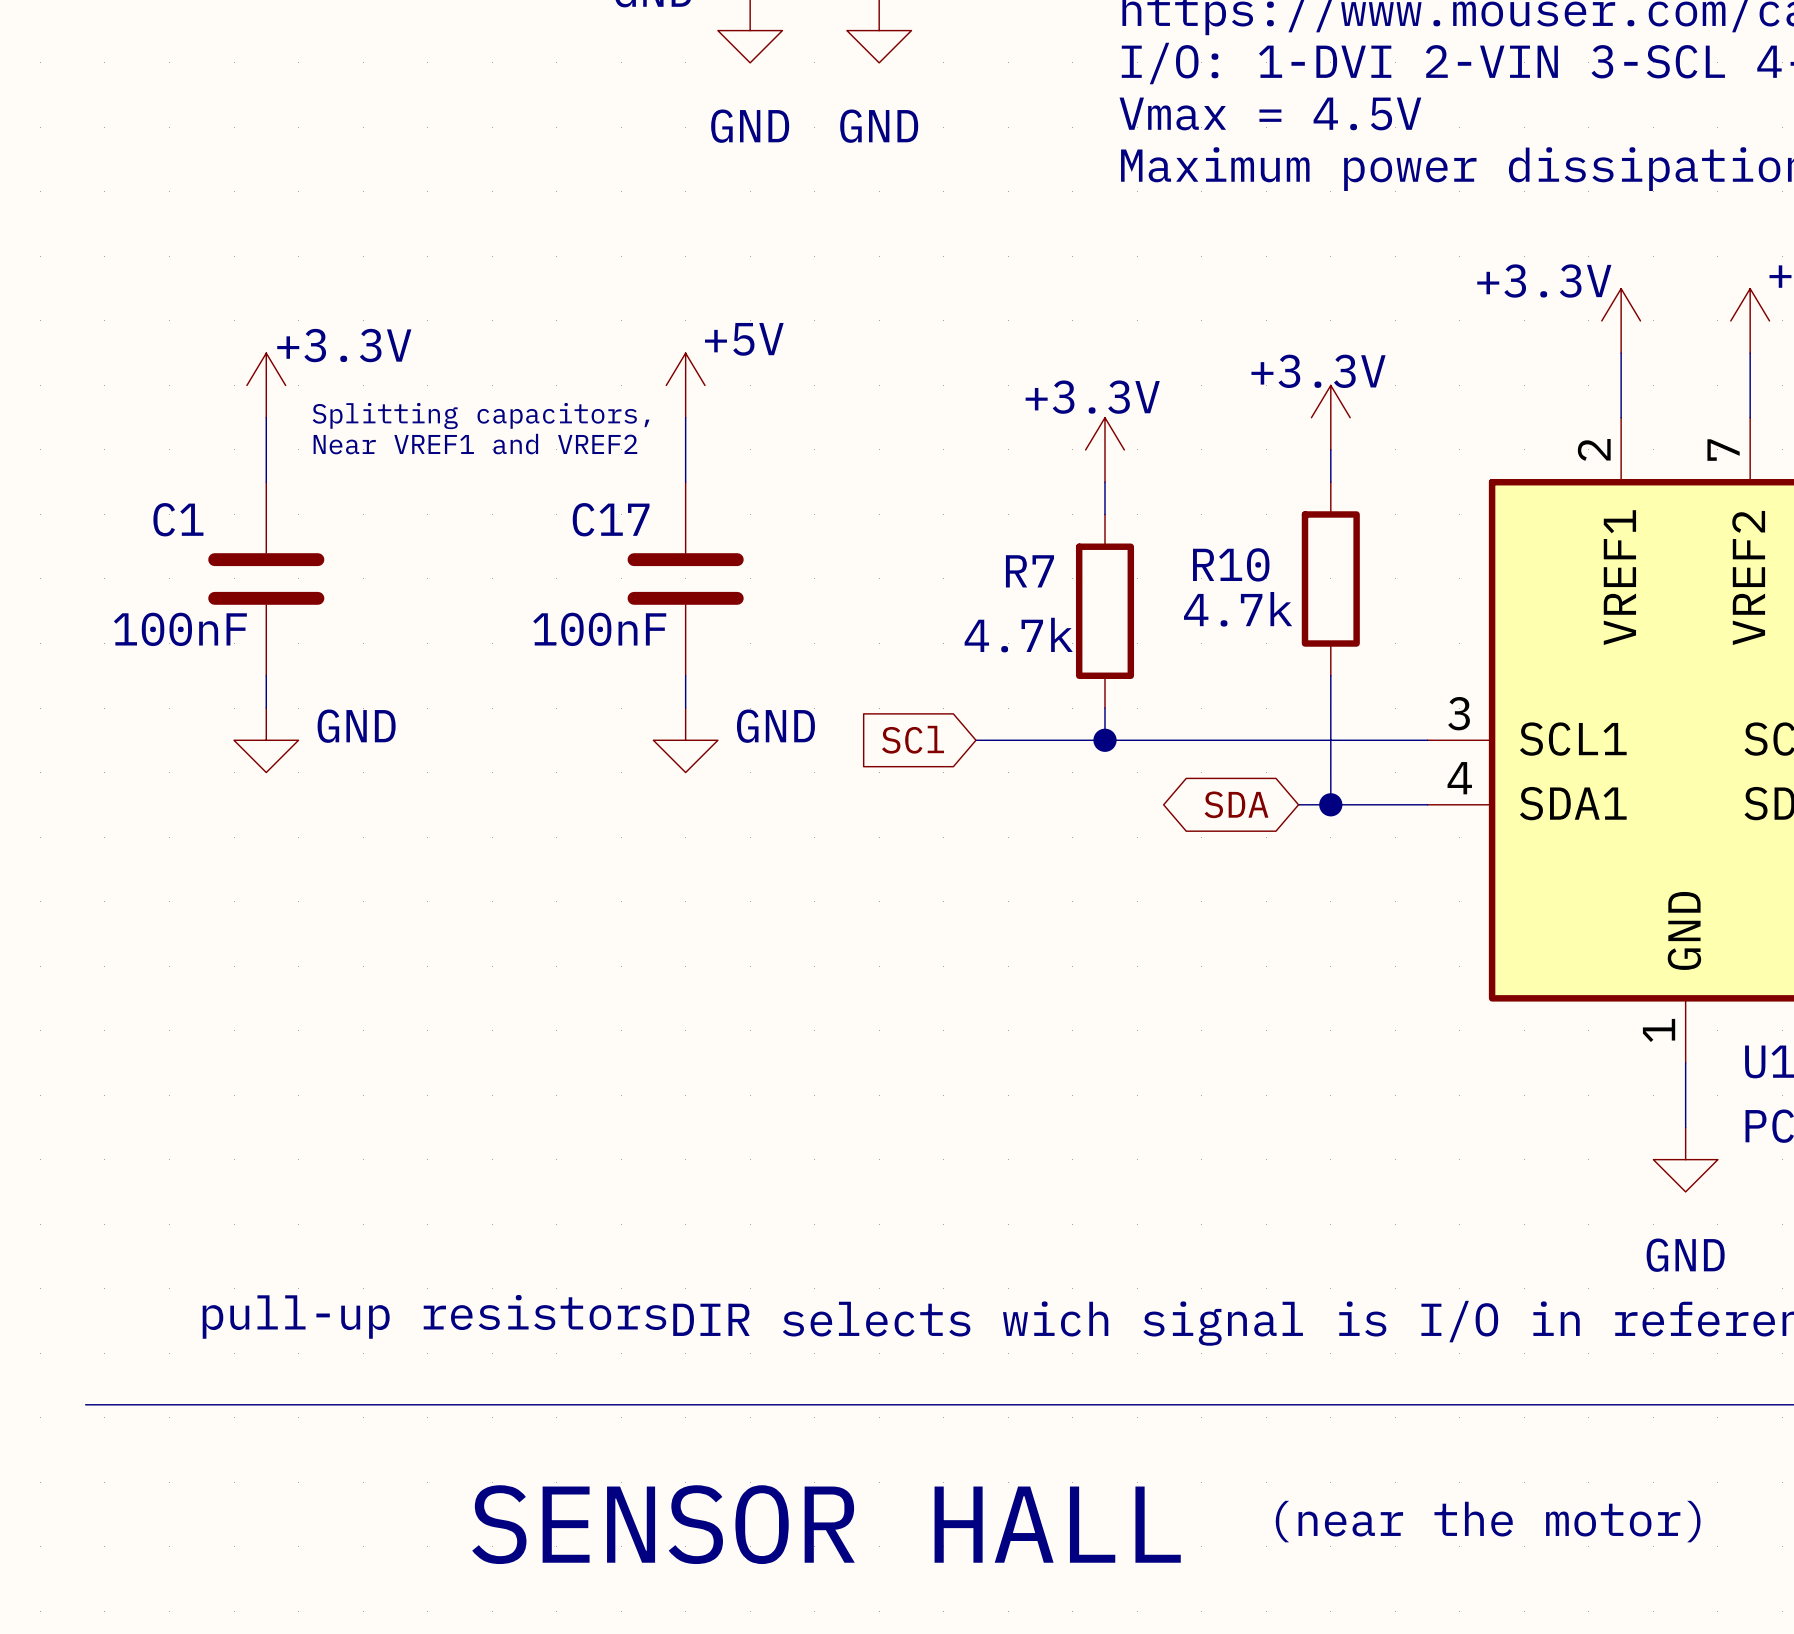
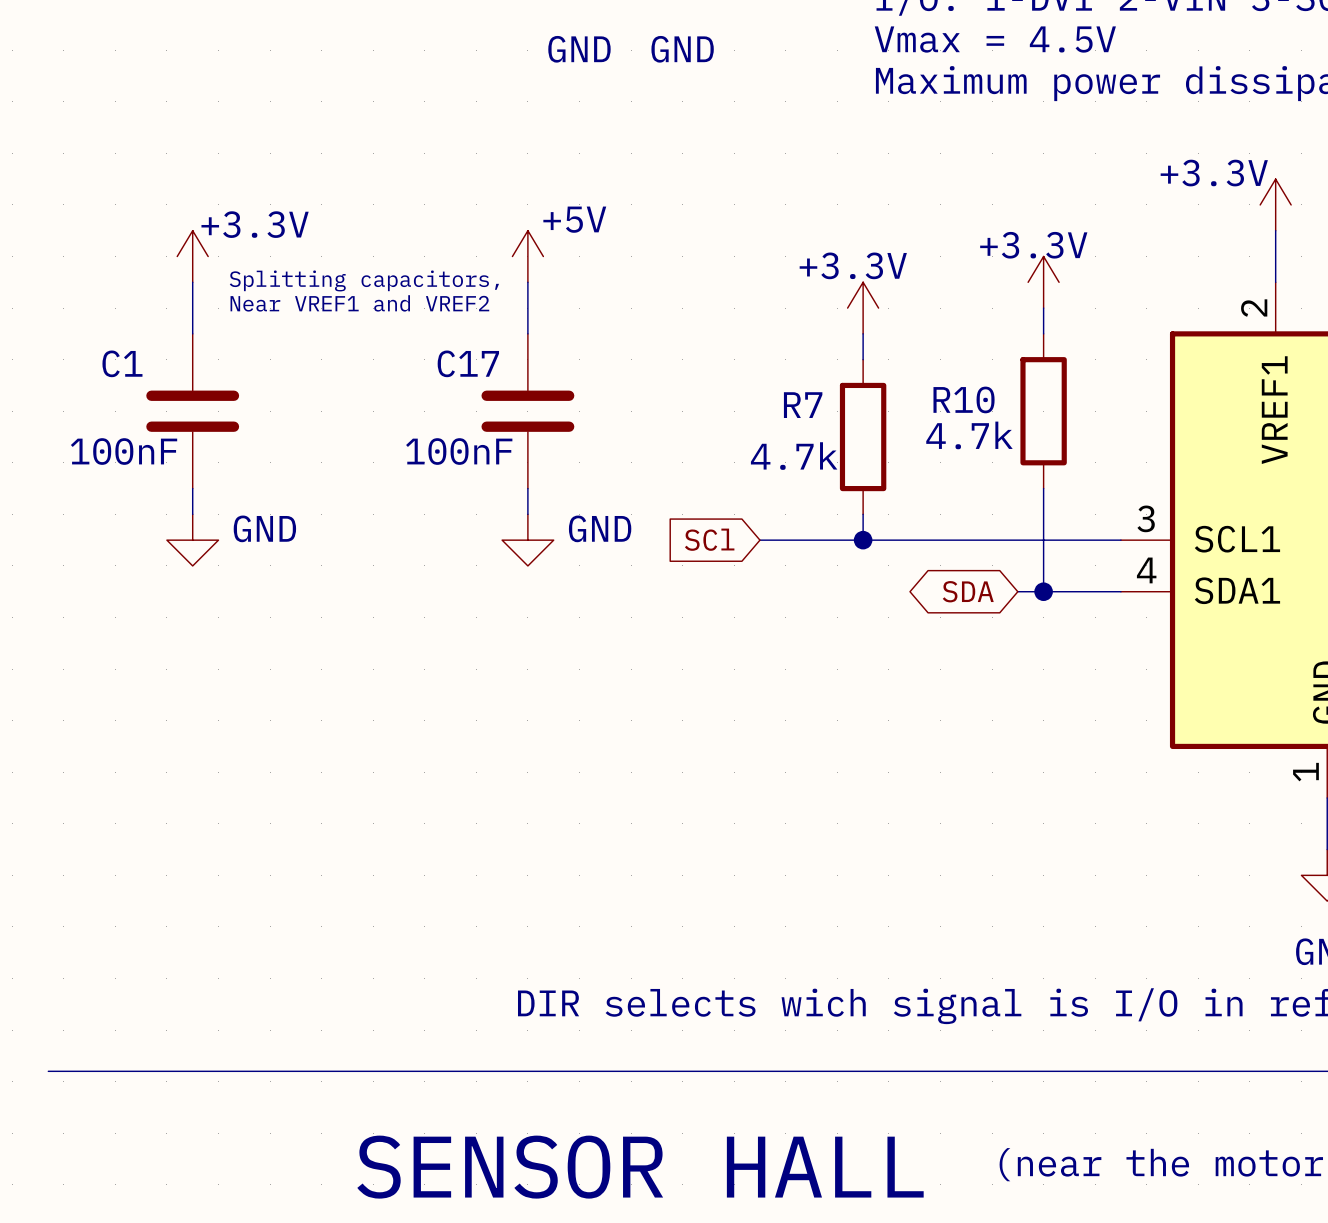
text: pull-up resistors (434, 1316) -> none

